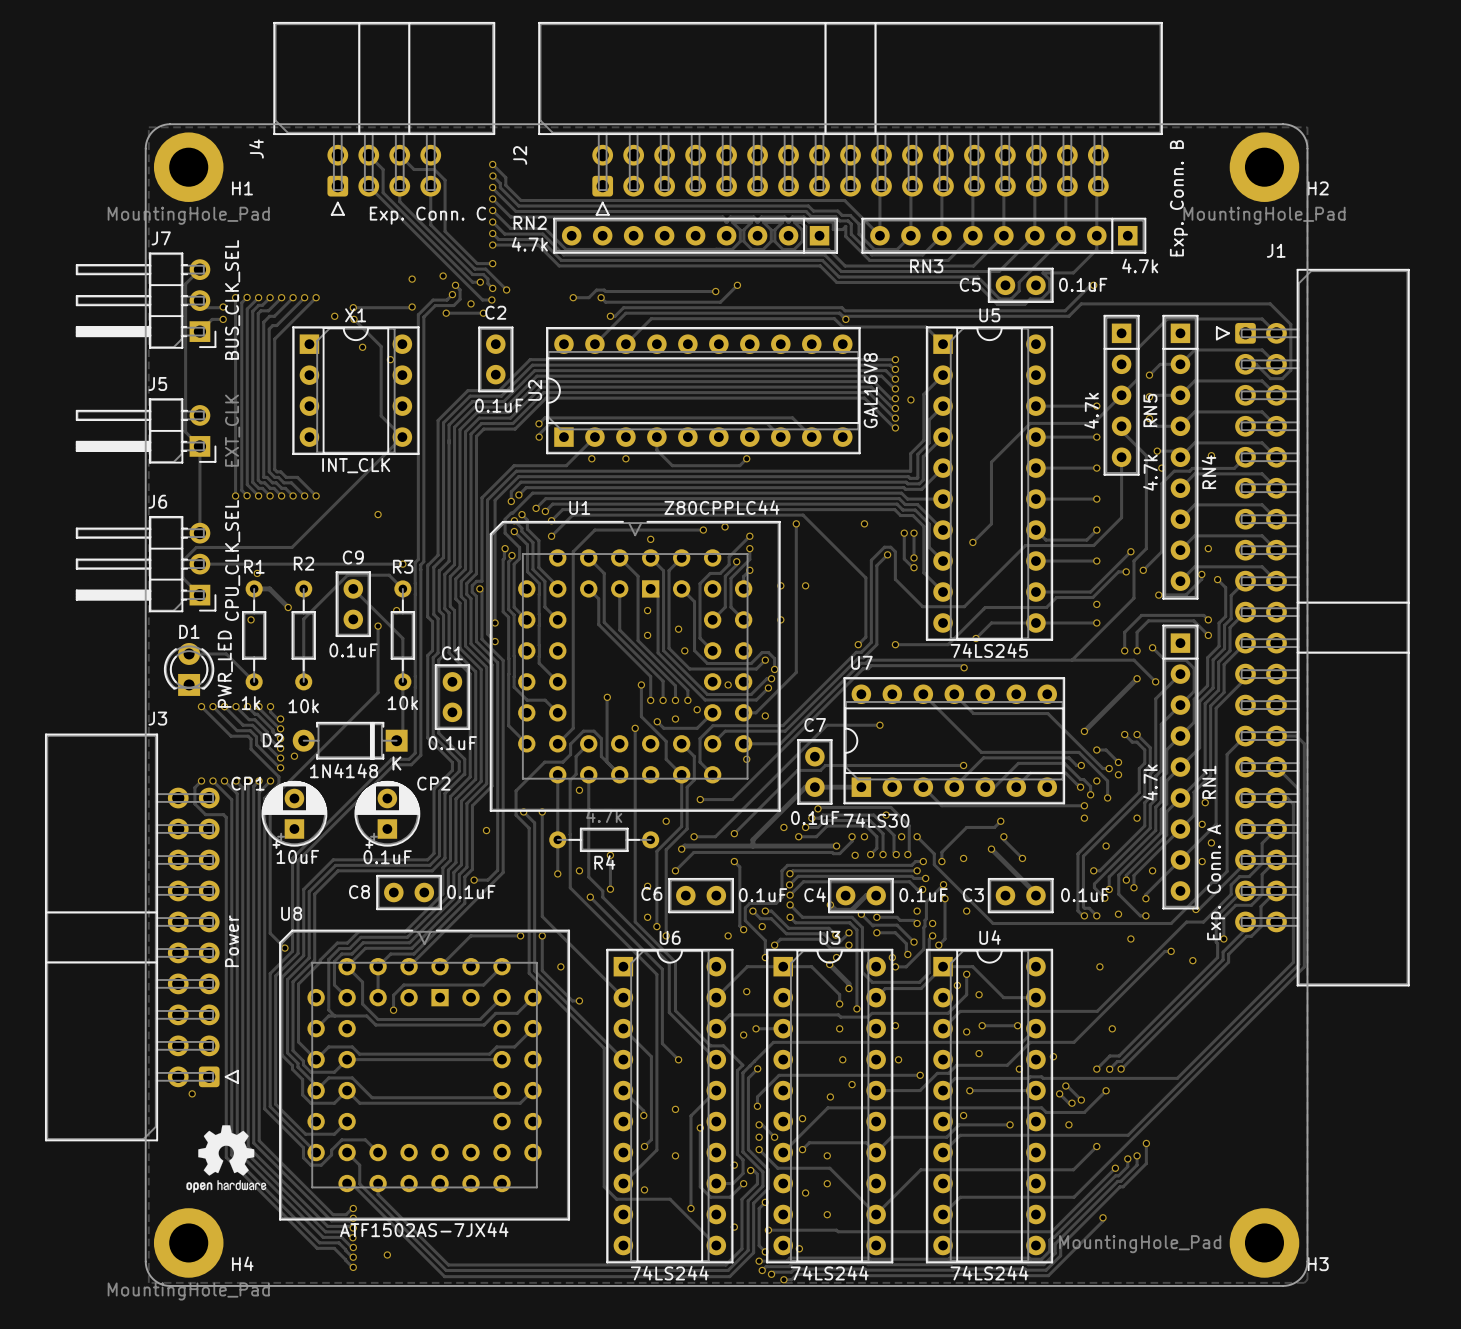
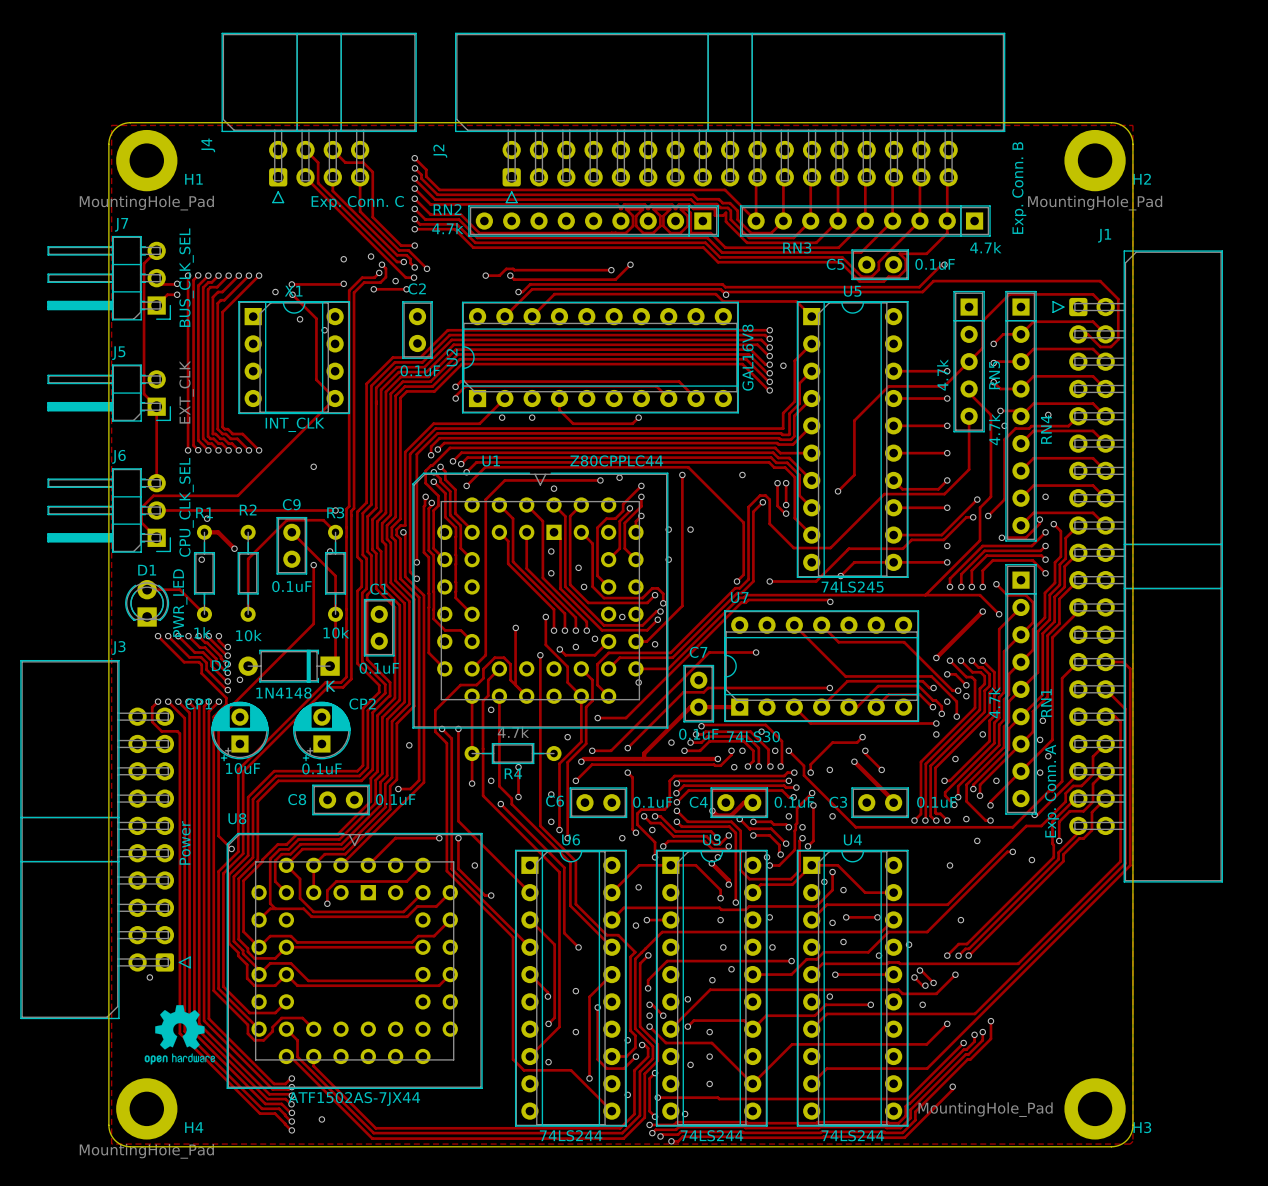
track: none -> (1045, 532) (1031, 545) (982, 545) (949, 578) (949, 586)
via: none -> (1045, 532)
track: none -> (1045, 545) (1040, 550) (984, 550) (961, 574) (961, 586)
via: none -> (1045, 545)
via: none -> (949, 586)
via: none -> (961, 586)
track: none -> (949, 660) (966, 677) (971, 677) (975, 680) (975, 707) (920, 761) (920, 814) (914, 820)
via: none -> (949, 660)
track: none -> (960, 660) (972, 672) (980, 672) (984, 676) (984, 683) (979, 688) (979, 709) (925, 763) (925, 820)
via: none -> (960, 660)
via: none -> (914, 820)
via: none -> (925, 820)

